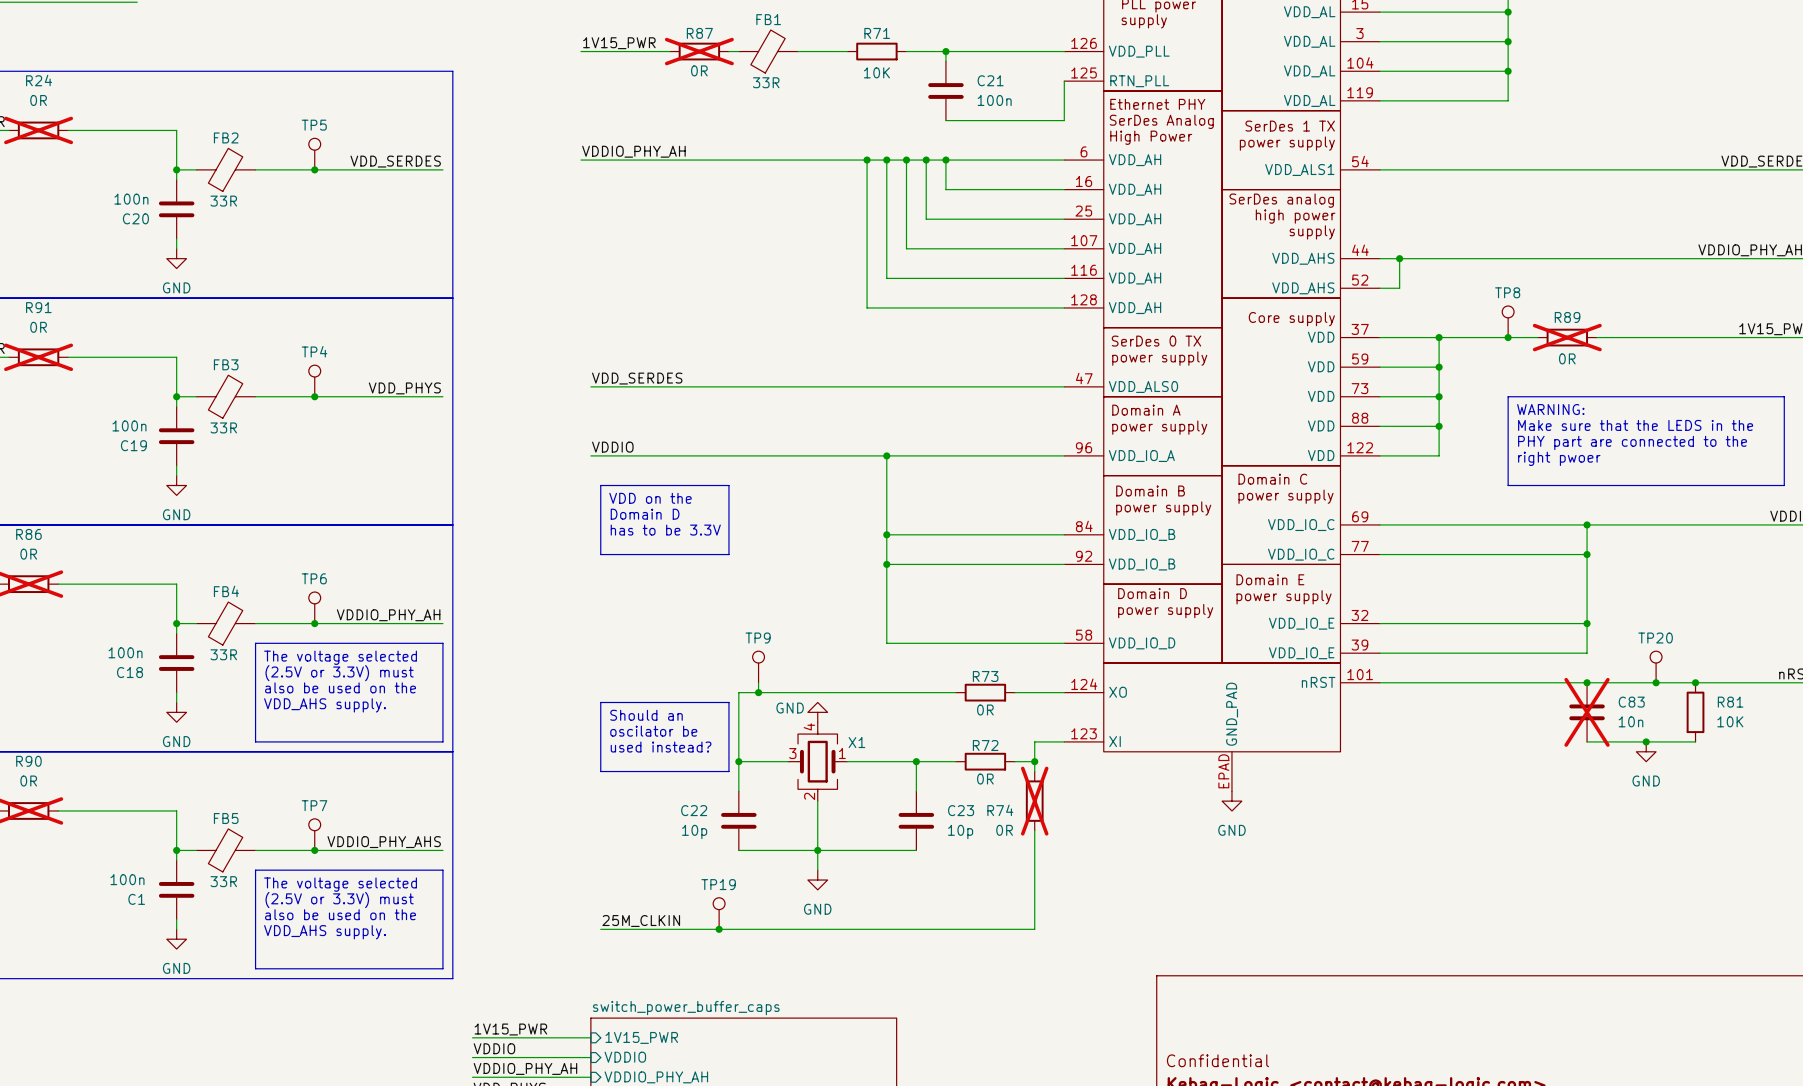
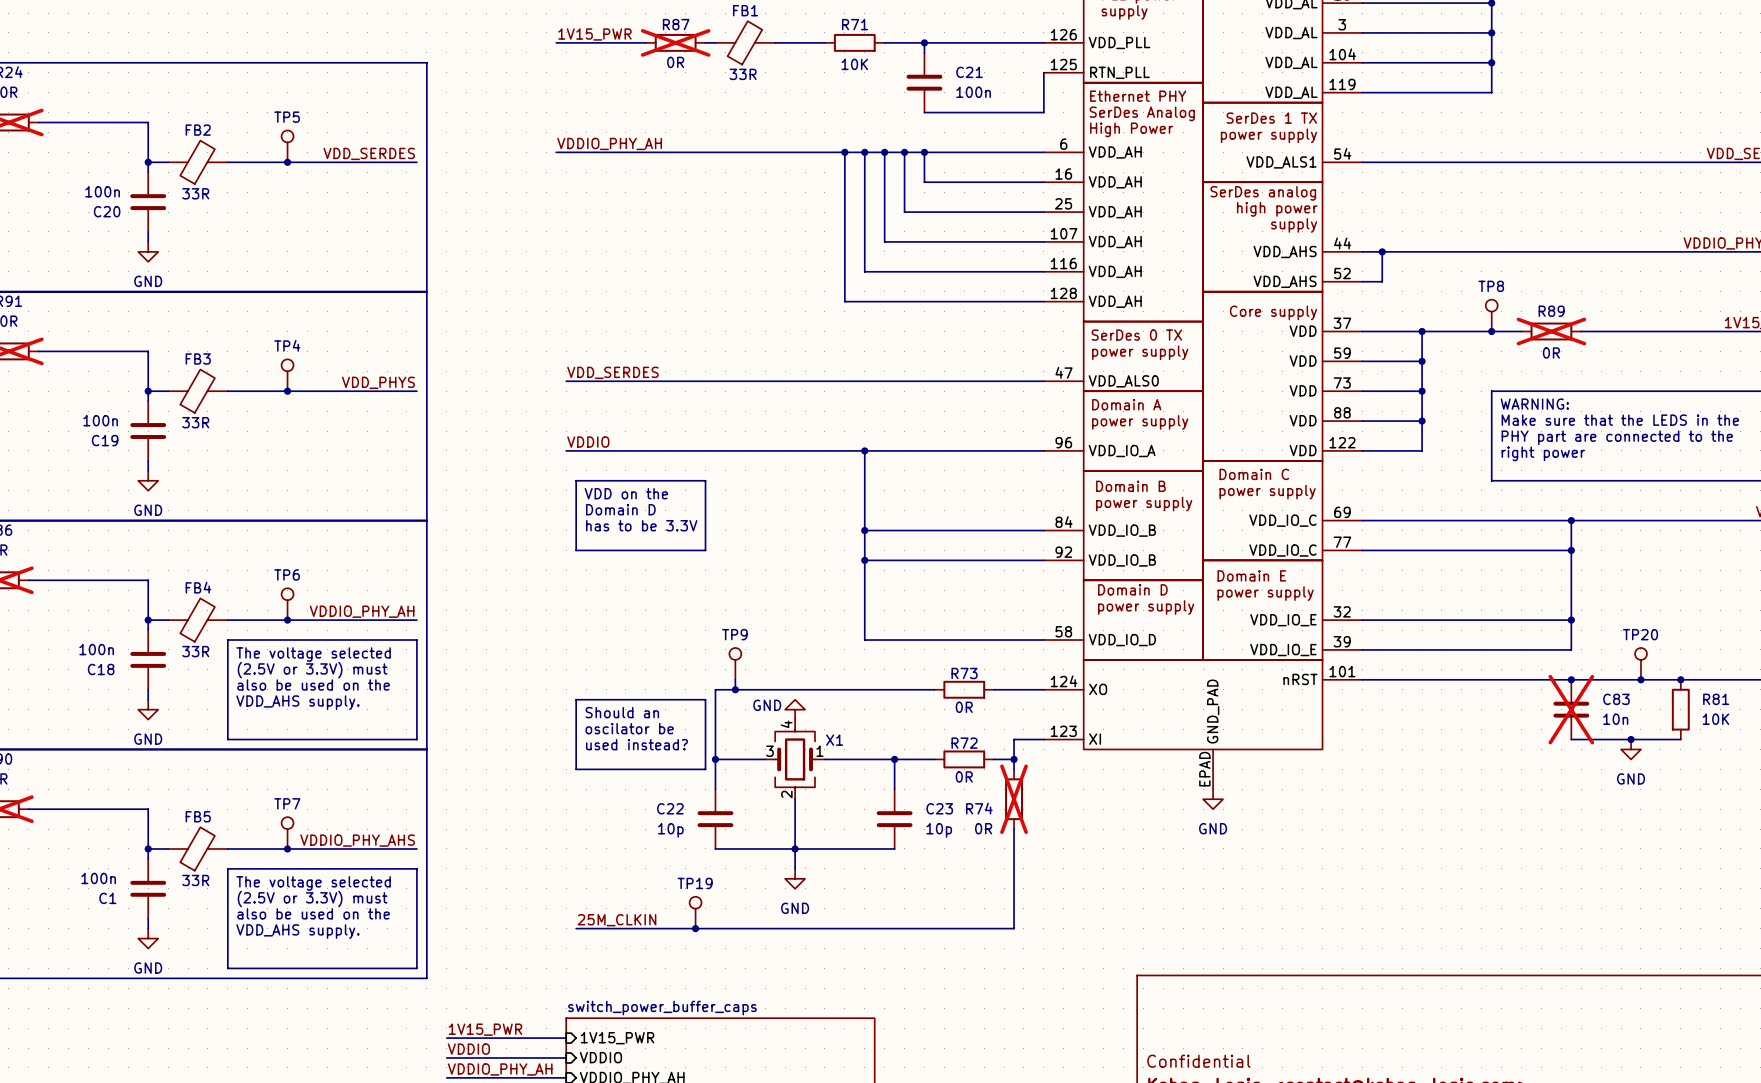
text: right pwoer (1559, 458) -> right power (1543, 453)

